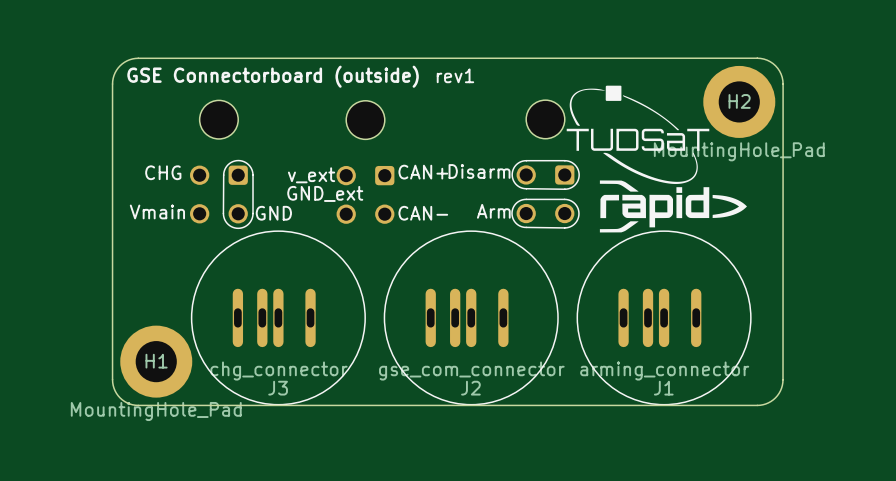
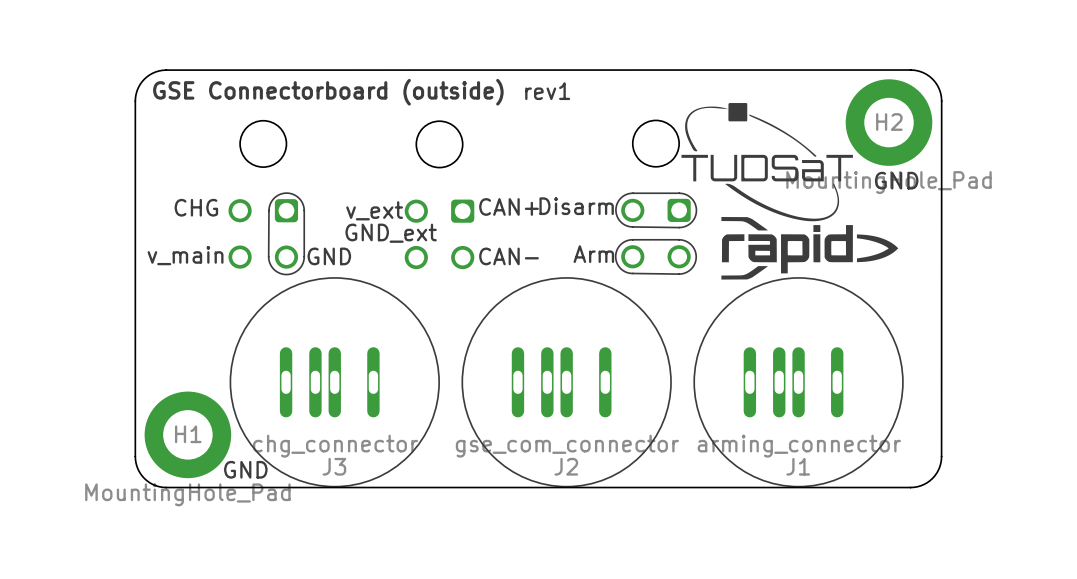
text: none -> GND (896, 180)
text: Vmain (157, 211) -> v_main (185, 255)
text: none -> GND (245, 469)

